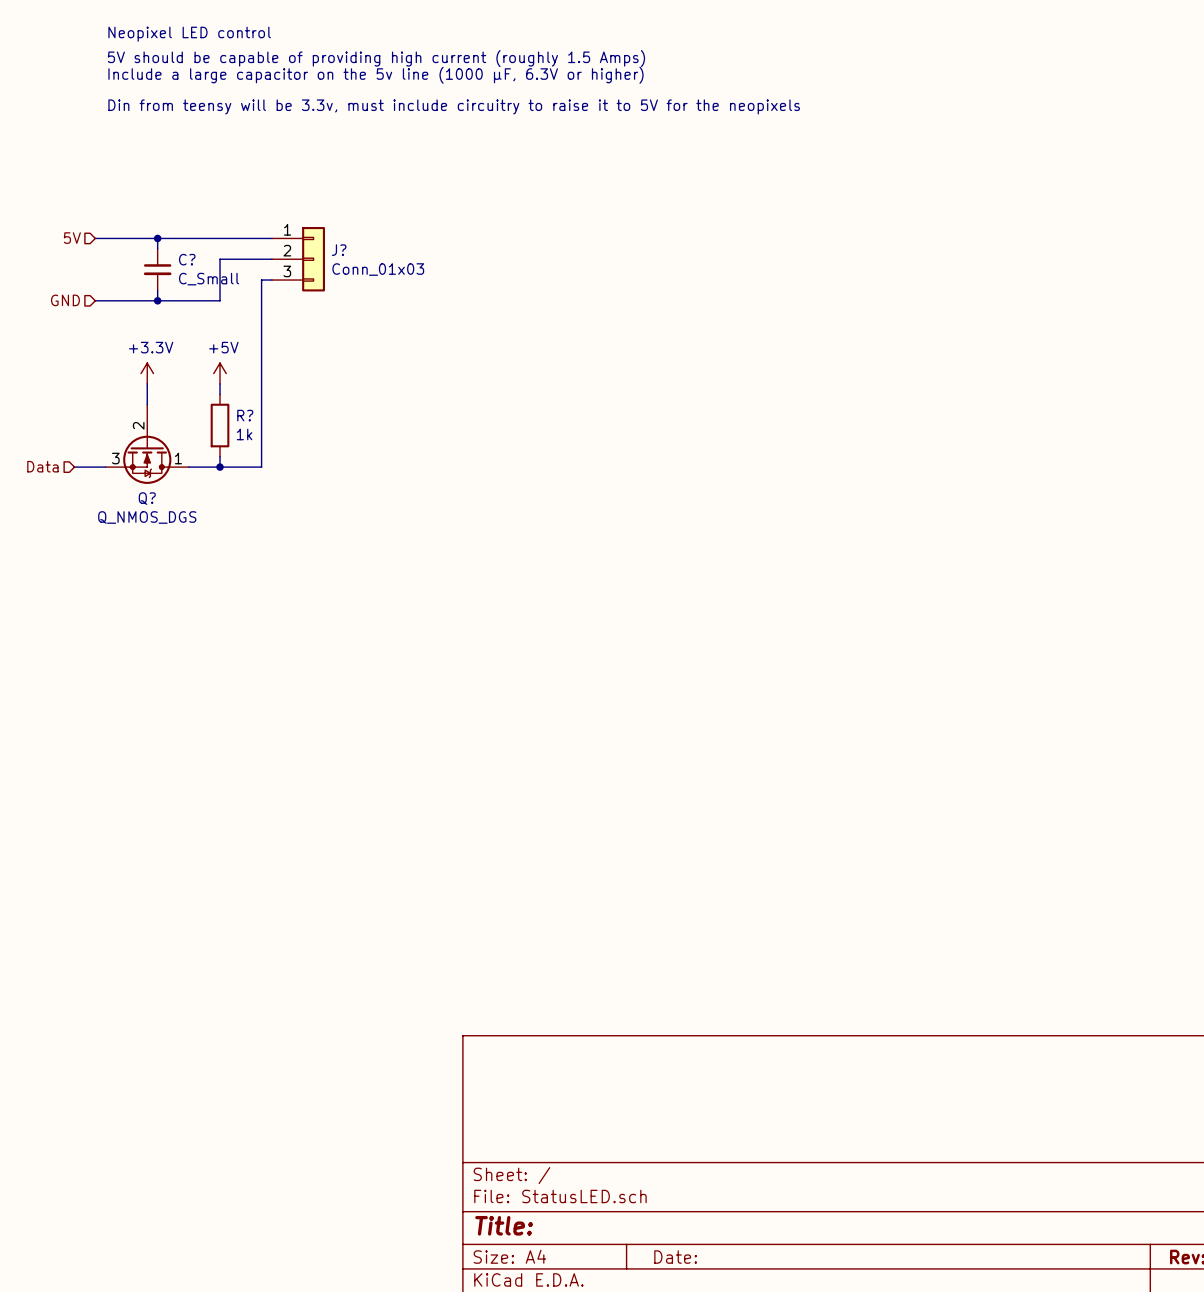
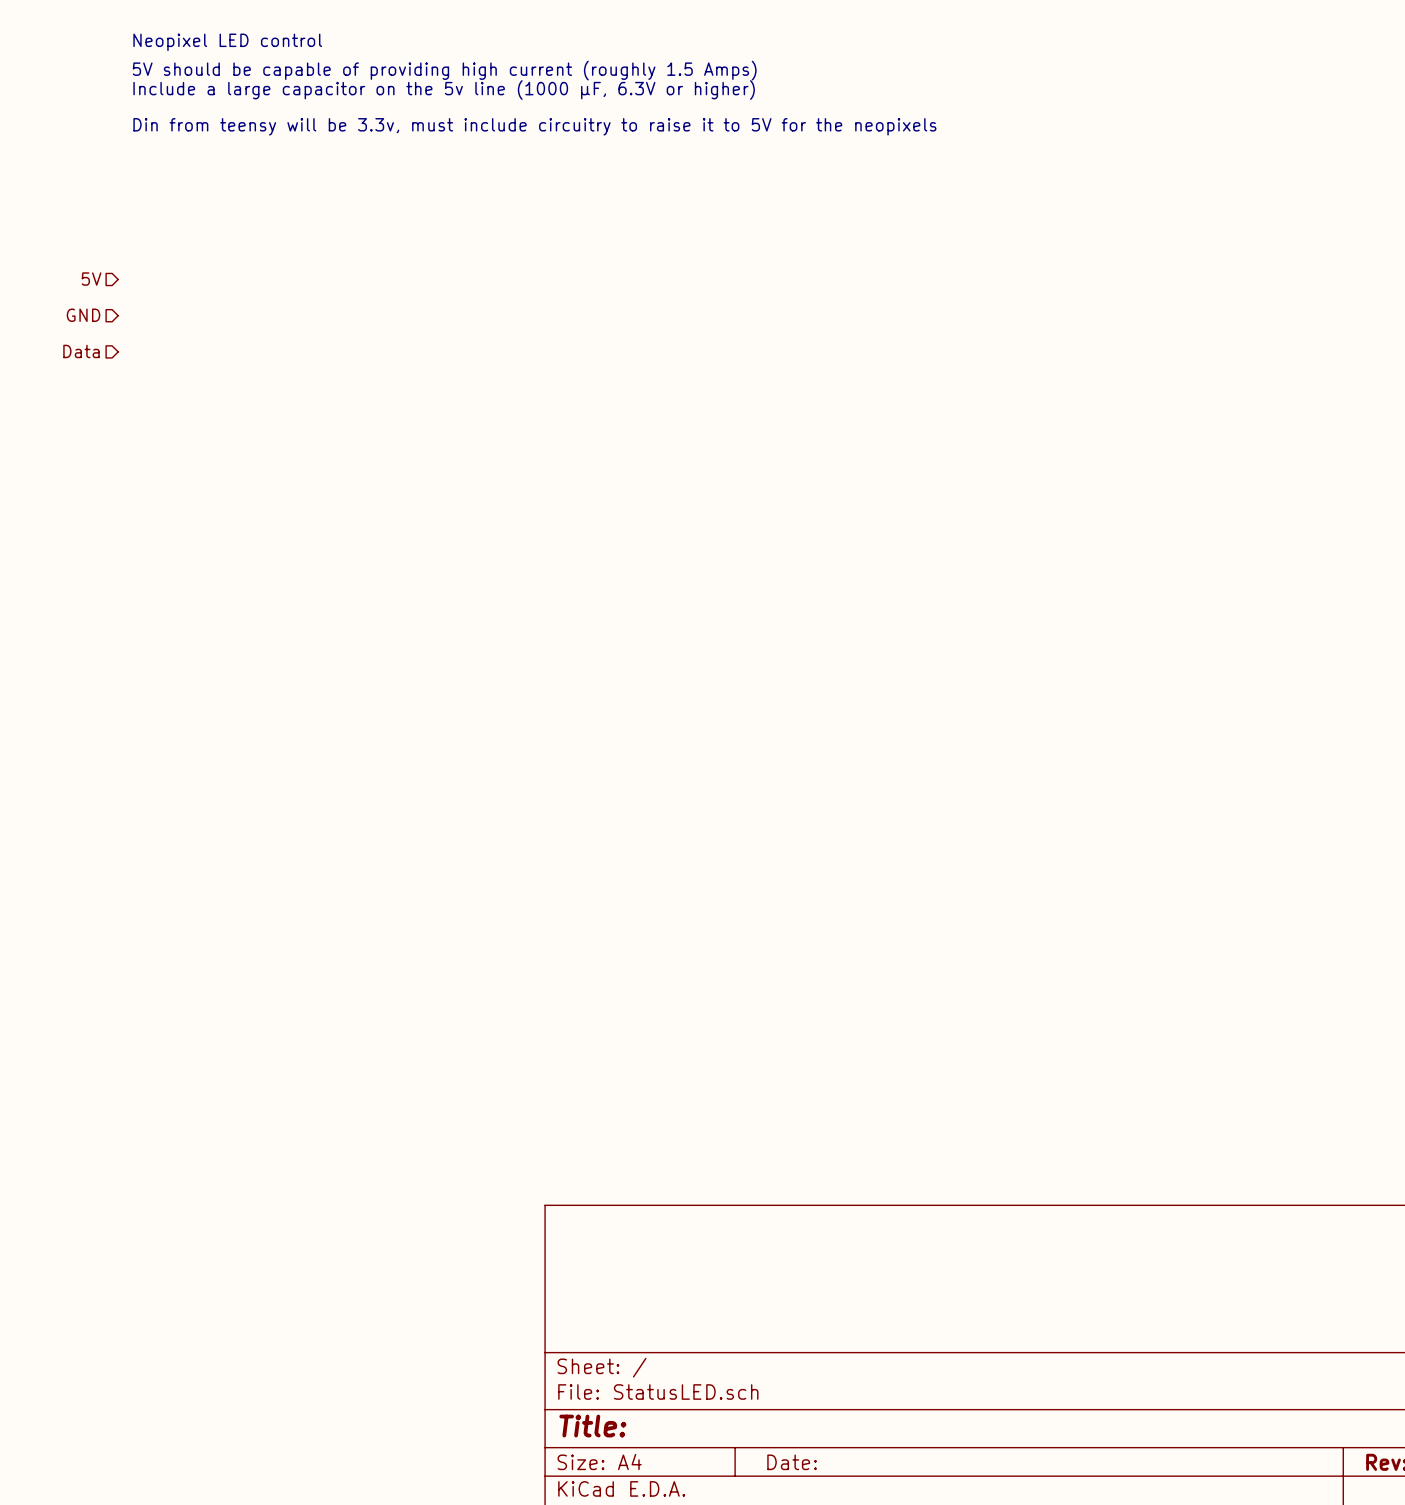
wire: (95, 238) (271, 238) -> none
wire: (157, 238) (157, 248) -> none
junction: (157, 238) -> none
wire: (271, 259) (220, 259) (220, 300) (95, 300) -> none
J?: Conn_01x03 (298, 259) -> none
hierarchical label: none -> GND (83, 315)
C?: C_Small (157, 269) -> none
wire: (271, 280) (261, 280) (261, 467) (188, 467) -> none
wire: (157, 290) (157, 300) -> none
hierarchical label: GND (65, 300) -> Data (81, 351)
junction: (157, 300) -> none
power symbol: +3.3V (147, 373) -> none
power symbol: +5V (220, 373) -> none
wire: (147, 383) (147, 404) -> none
wire: (220, 383) (220, 394) -> none
R?: 1k (220, 425) -> none
Q?: Q_NMOS_DGS (147, 444) -> none
wire: (220, 456) (220, 467) -> none
hierarchical label: Data (42, 466) -> none
wire: (74, 467) (105, 467) -> none
junction: (220, 467) -> none

